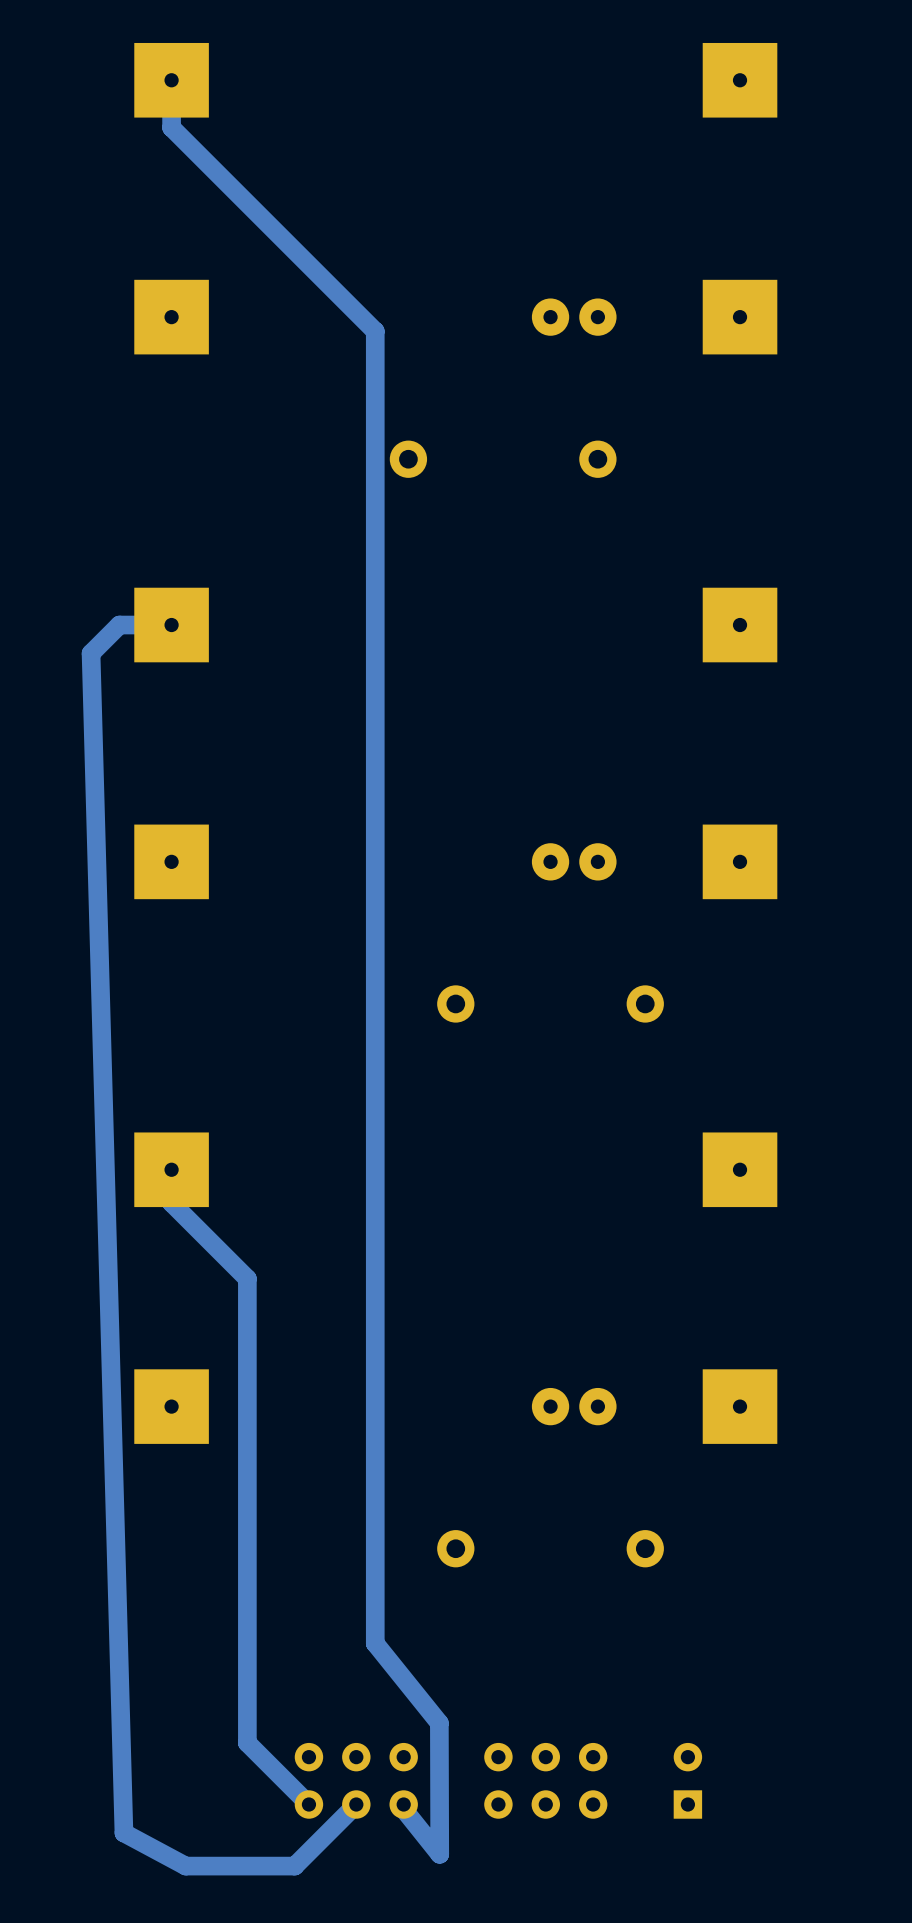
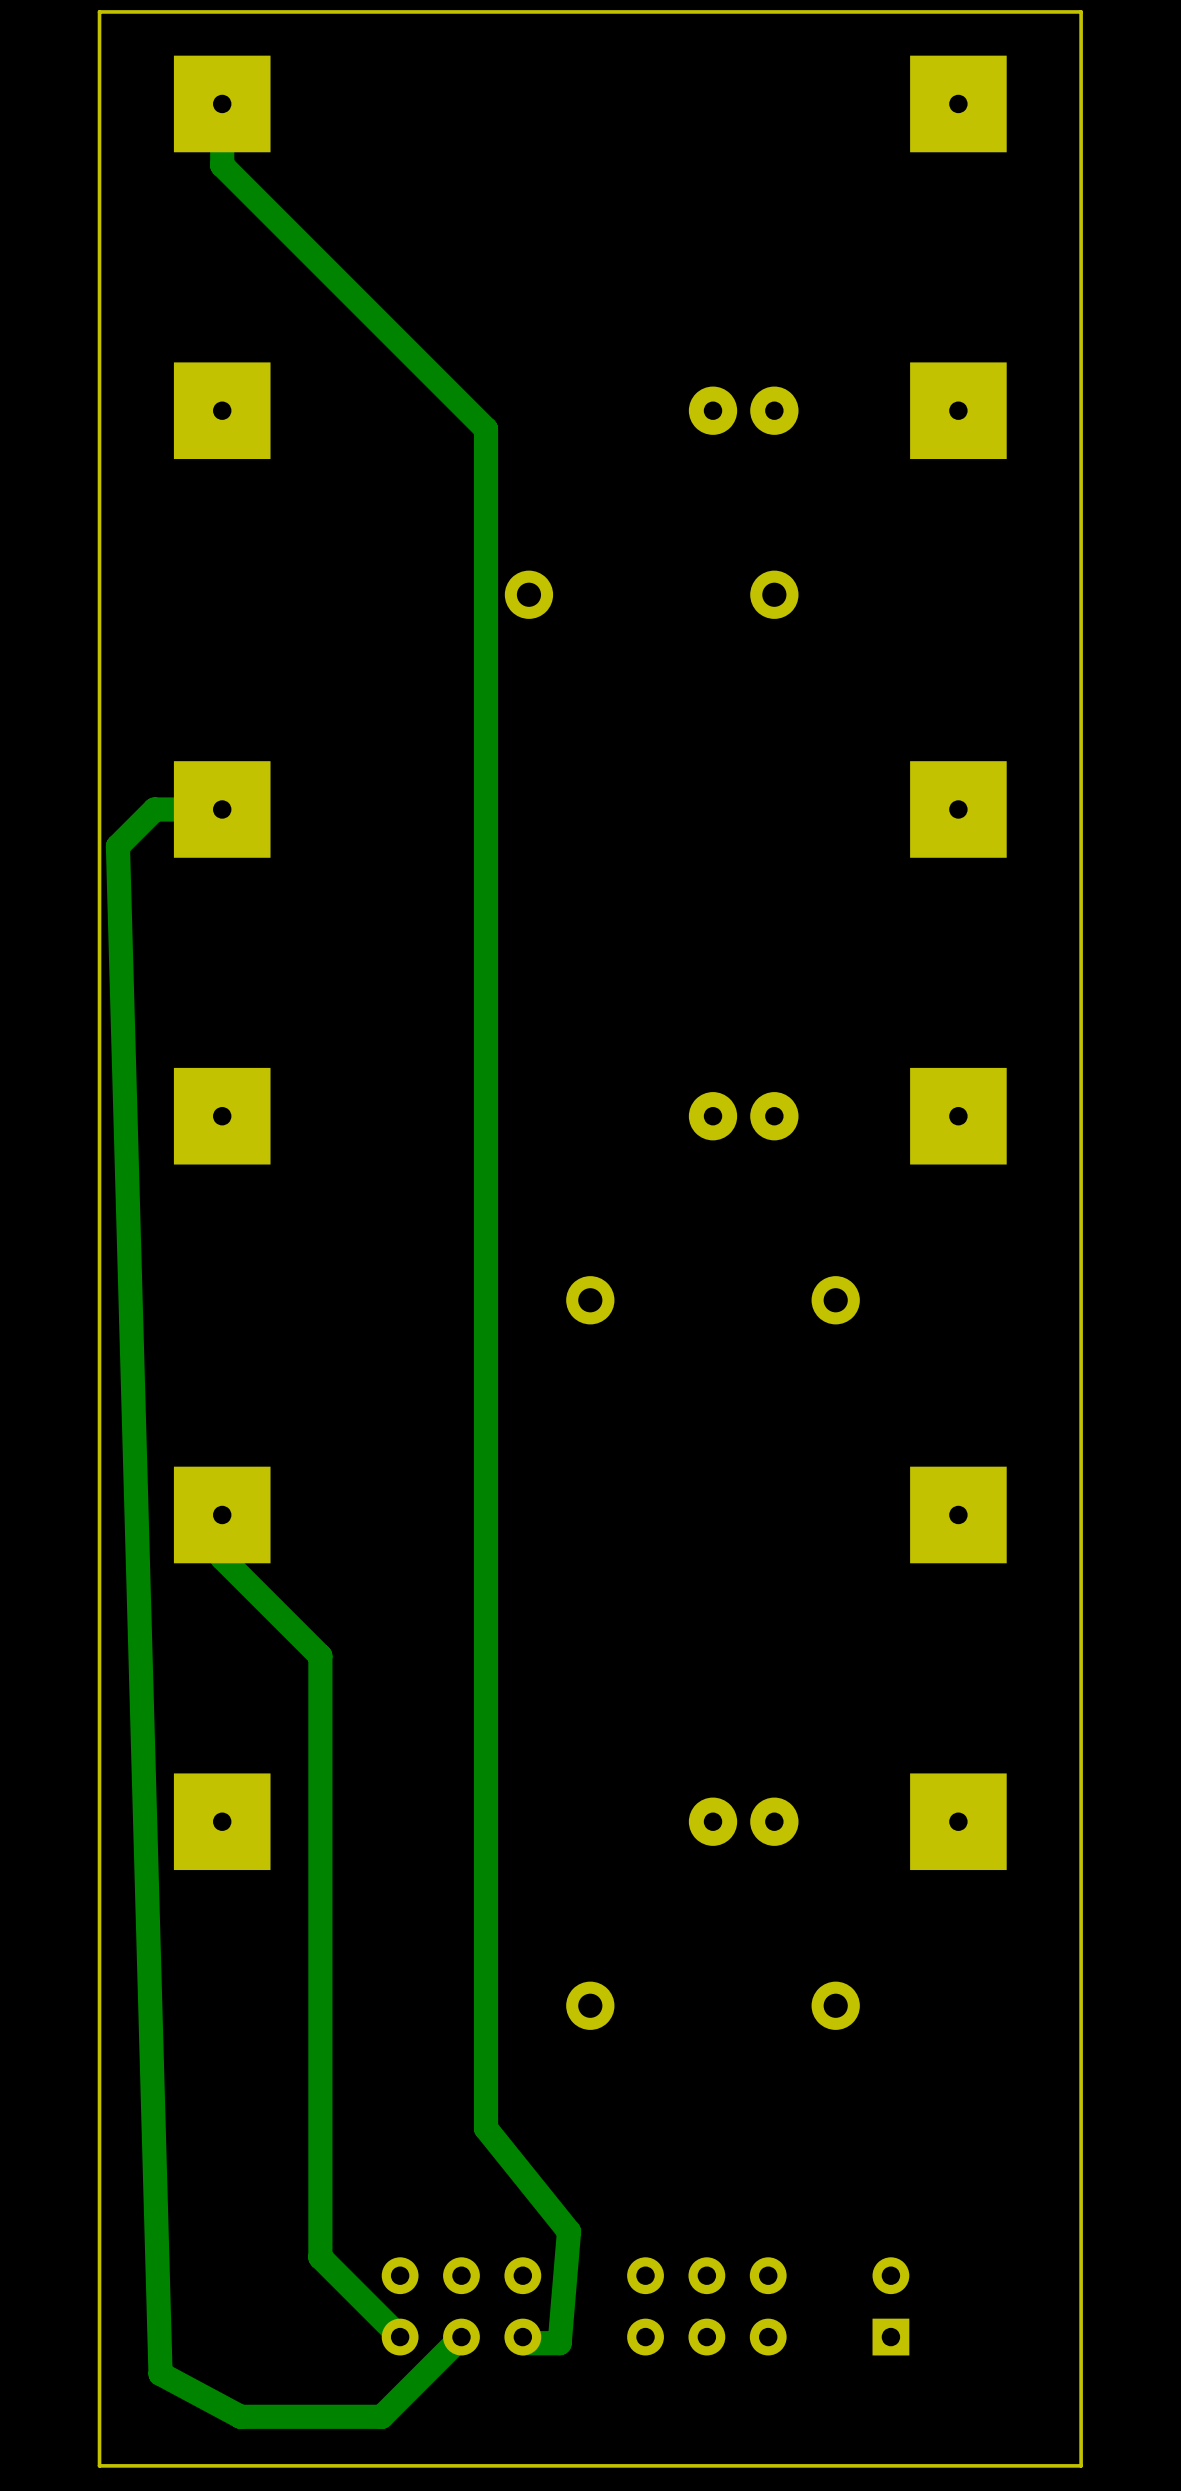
board edge: none -> (1081, 11) (99, 11) (99, 2465) (1081, 2465) (1081, 11)
track: (439, 1723) (439, 1854) (403, 1809) -> (569, 2231) (559, 2343) (522, 2343)

